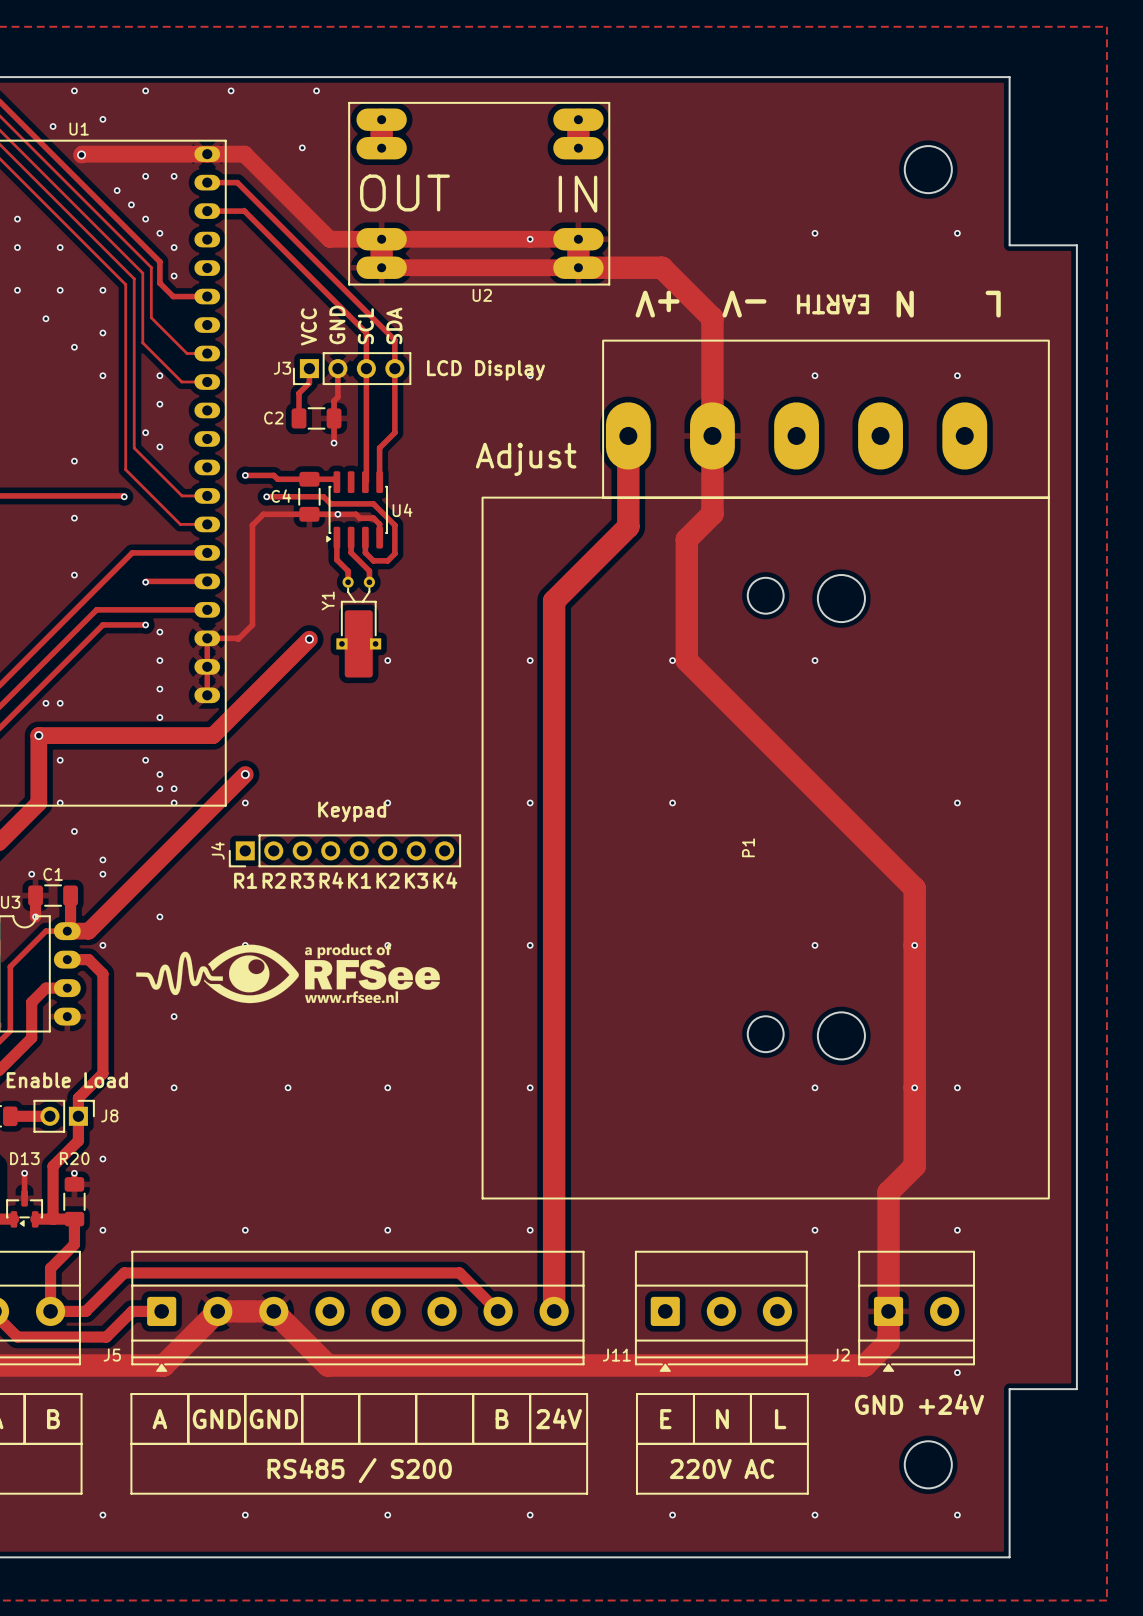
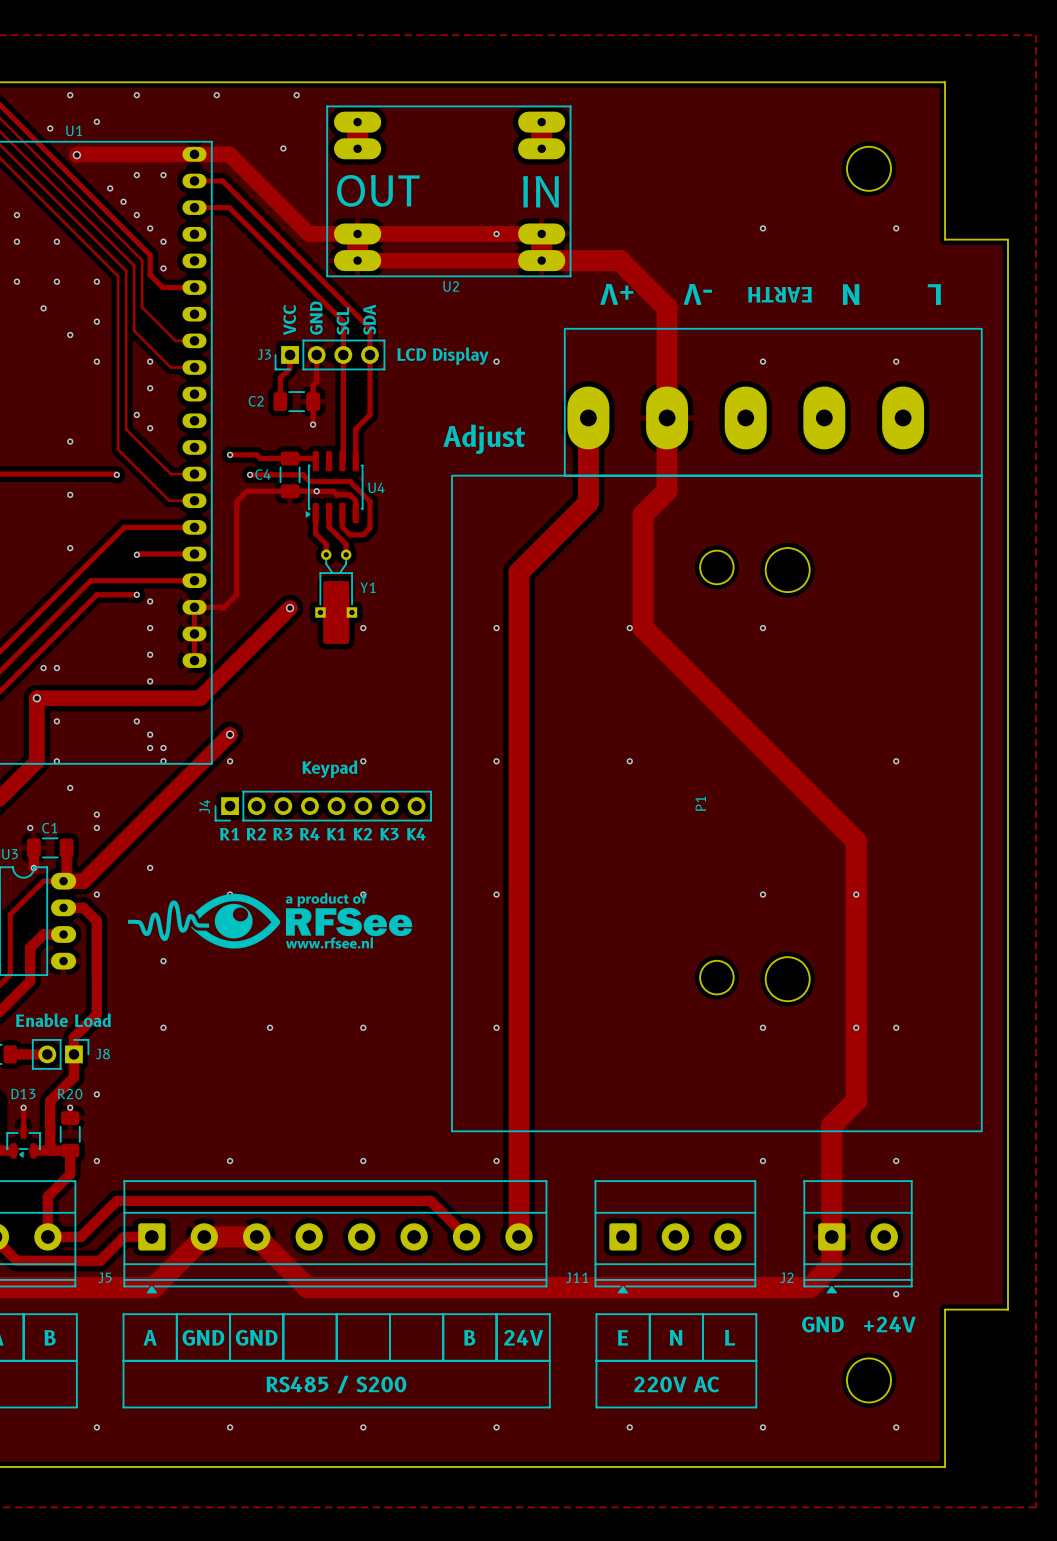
Y1 name rotation: 0° (328, 600) -> 90° clockwise (367, 587)
Y1 name position: Y1 (328, 600) -> Y1 (367, 587)

